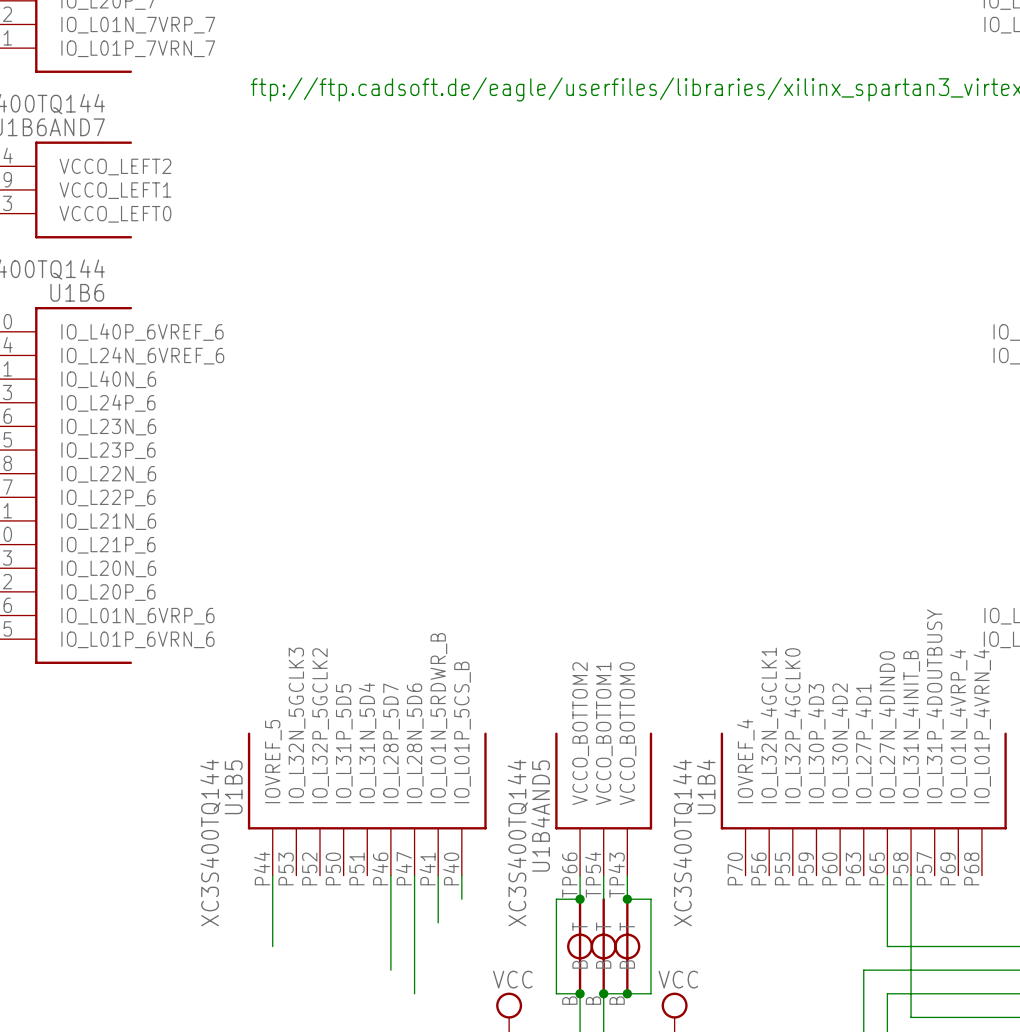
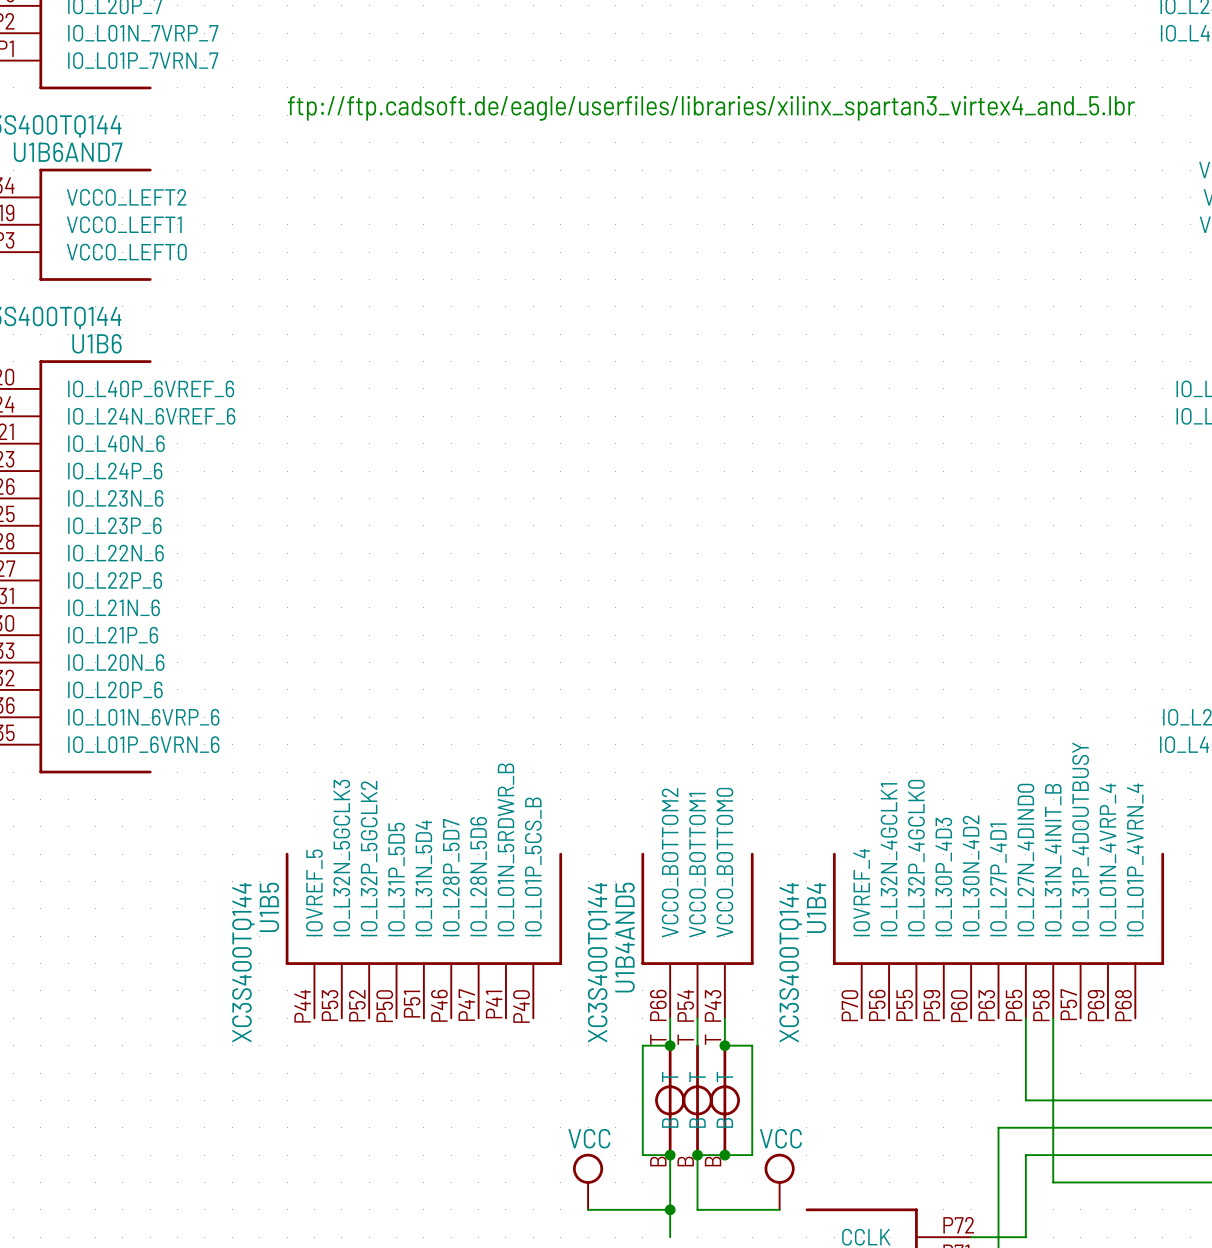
wire: (272, 875) (272, 946) -> none
wire: (390, 875) (390, 970) -> none
wire: (414, 875) (414, 993) -> none
wire: (438, 875) (438, 922) -> none
wire: (461, 875) (461, 899) -> none

